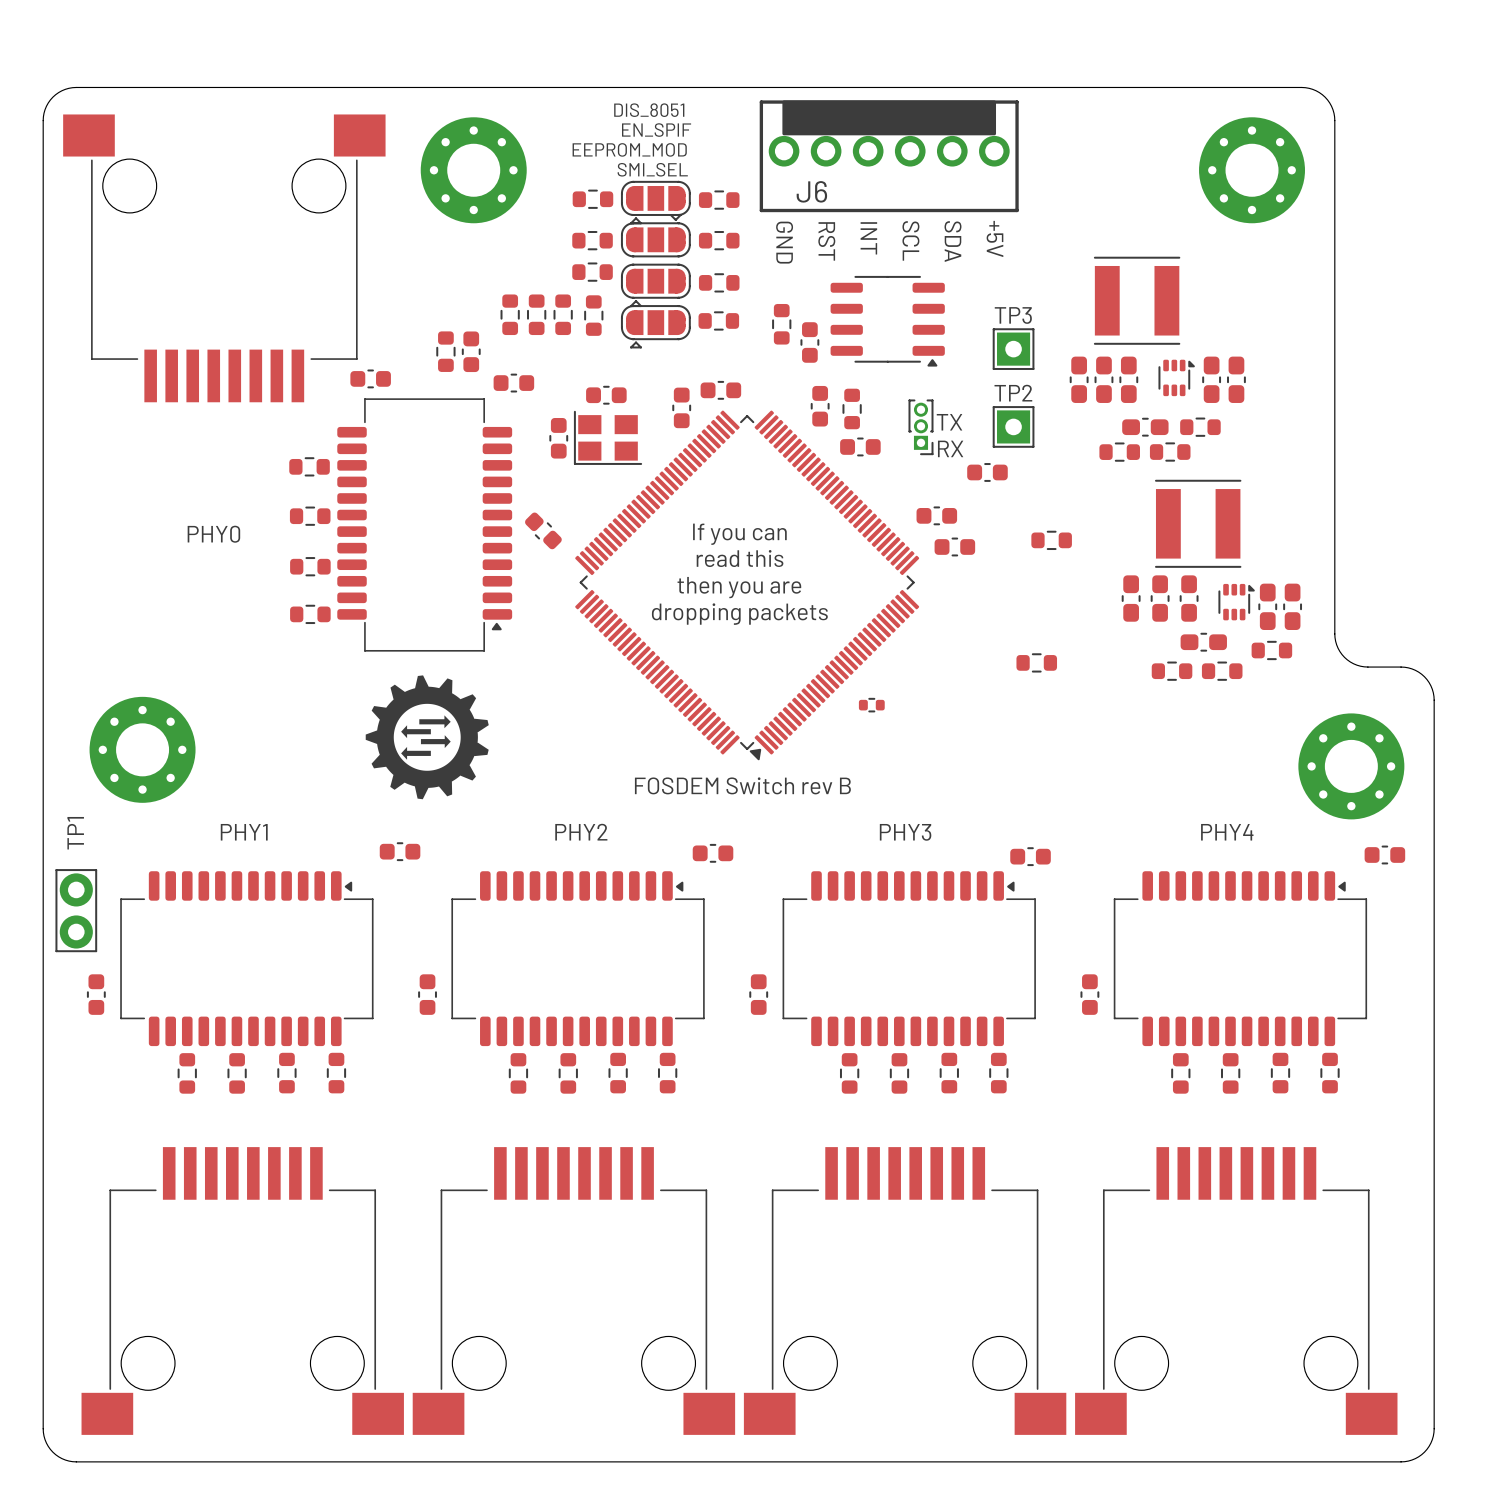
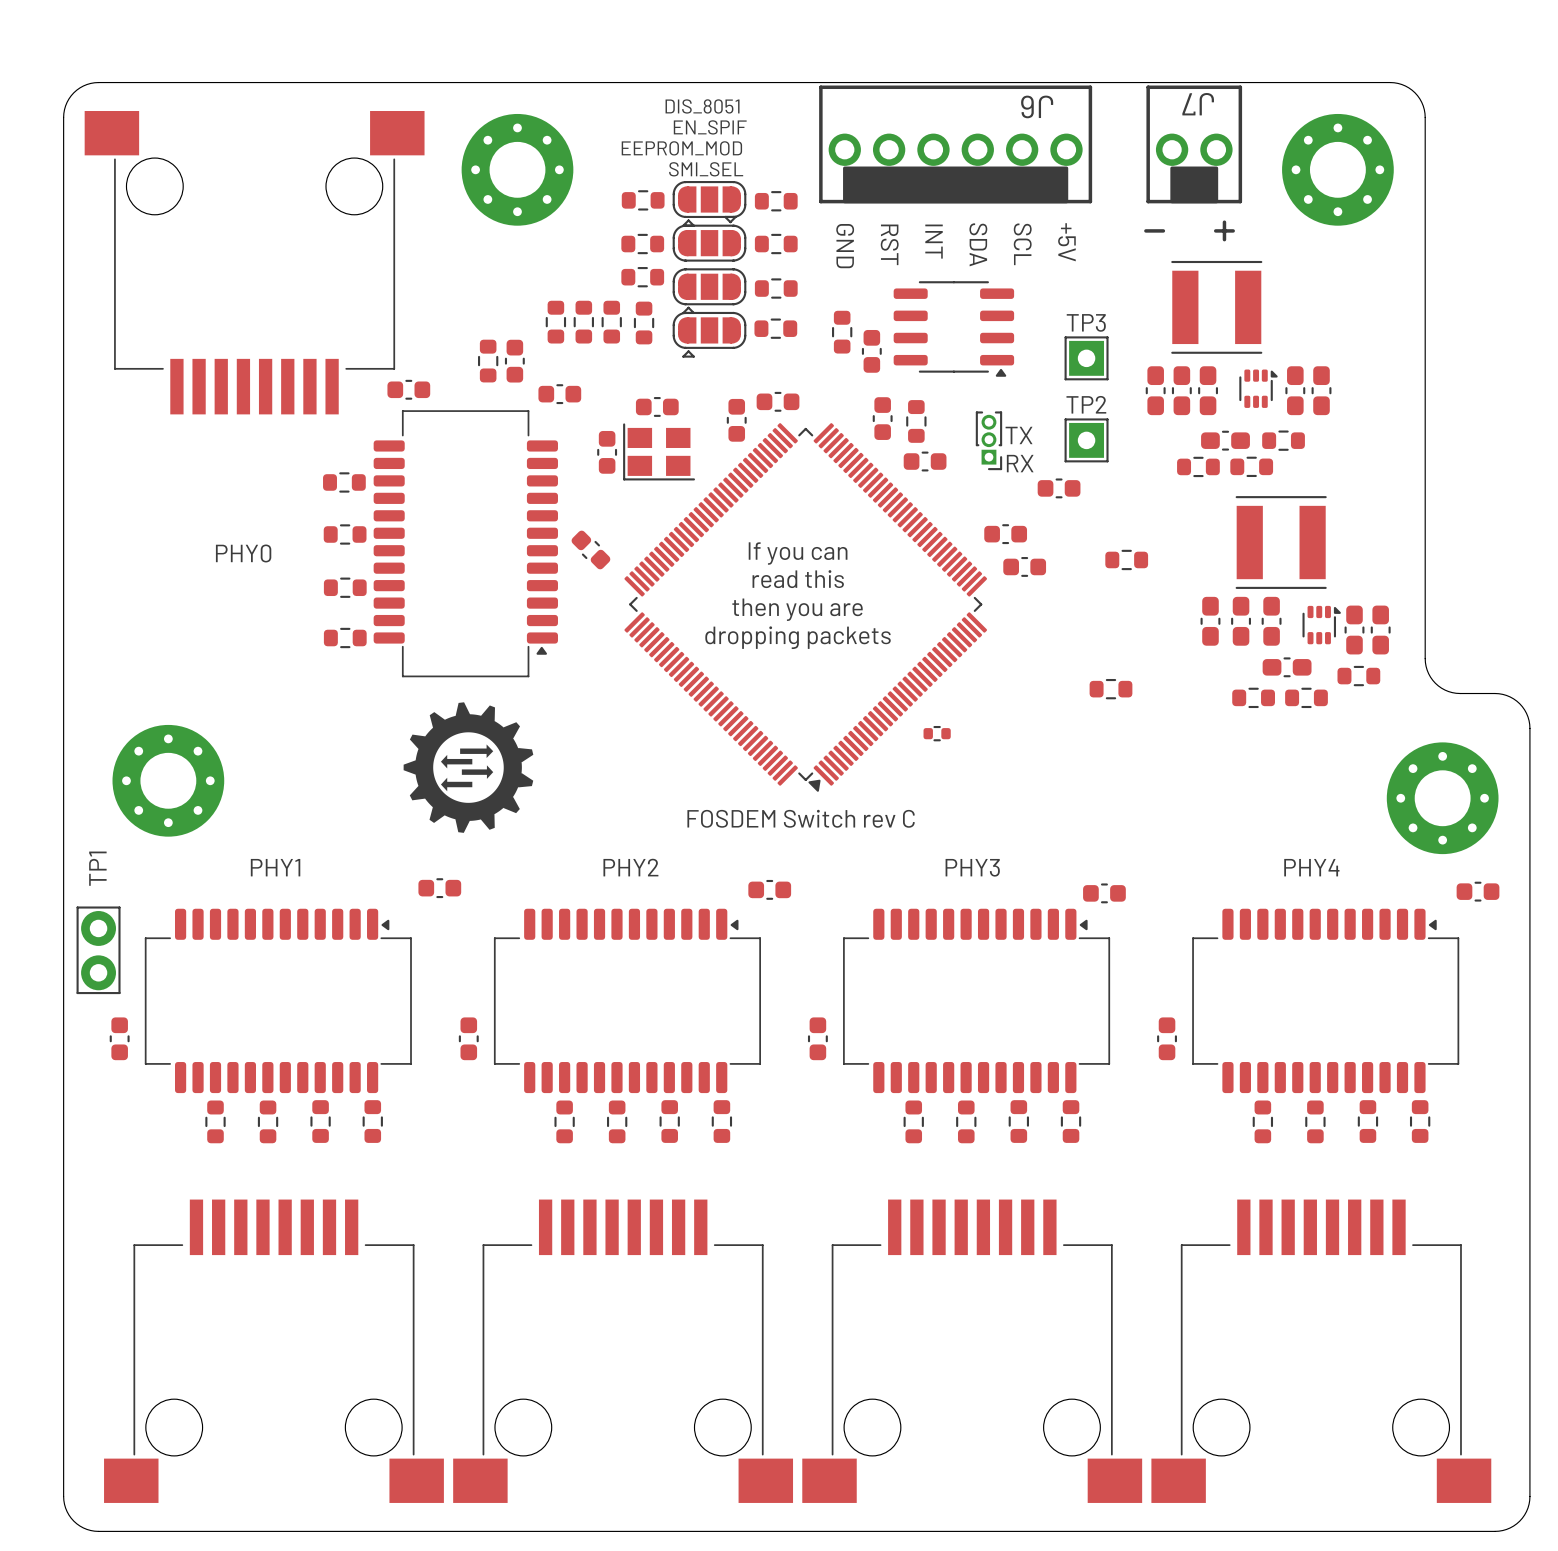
J7: none -> (1194, 144)
J6 rotation: 0° (889, 156) -> 180° (955, 144)
line: none -> (1224, 222) (1224, 239)
line: none -> (1145, 230) (1163, 230)
line: none -> (1215, 230) (1233, 230)
text: SCL (910, 240) -> SDA (978, 244)
text: SDA (952, 241) -> SCL (1022, 244)
text: FOSDEM Switch rev B (742, 785) -> FOSDEM Switch rev C (801, 818)

